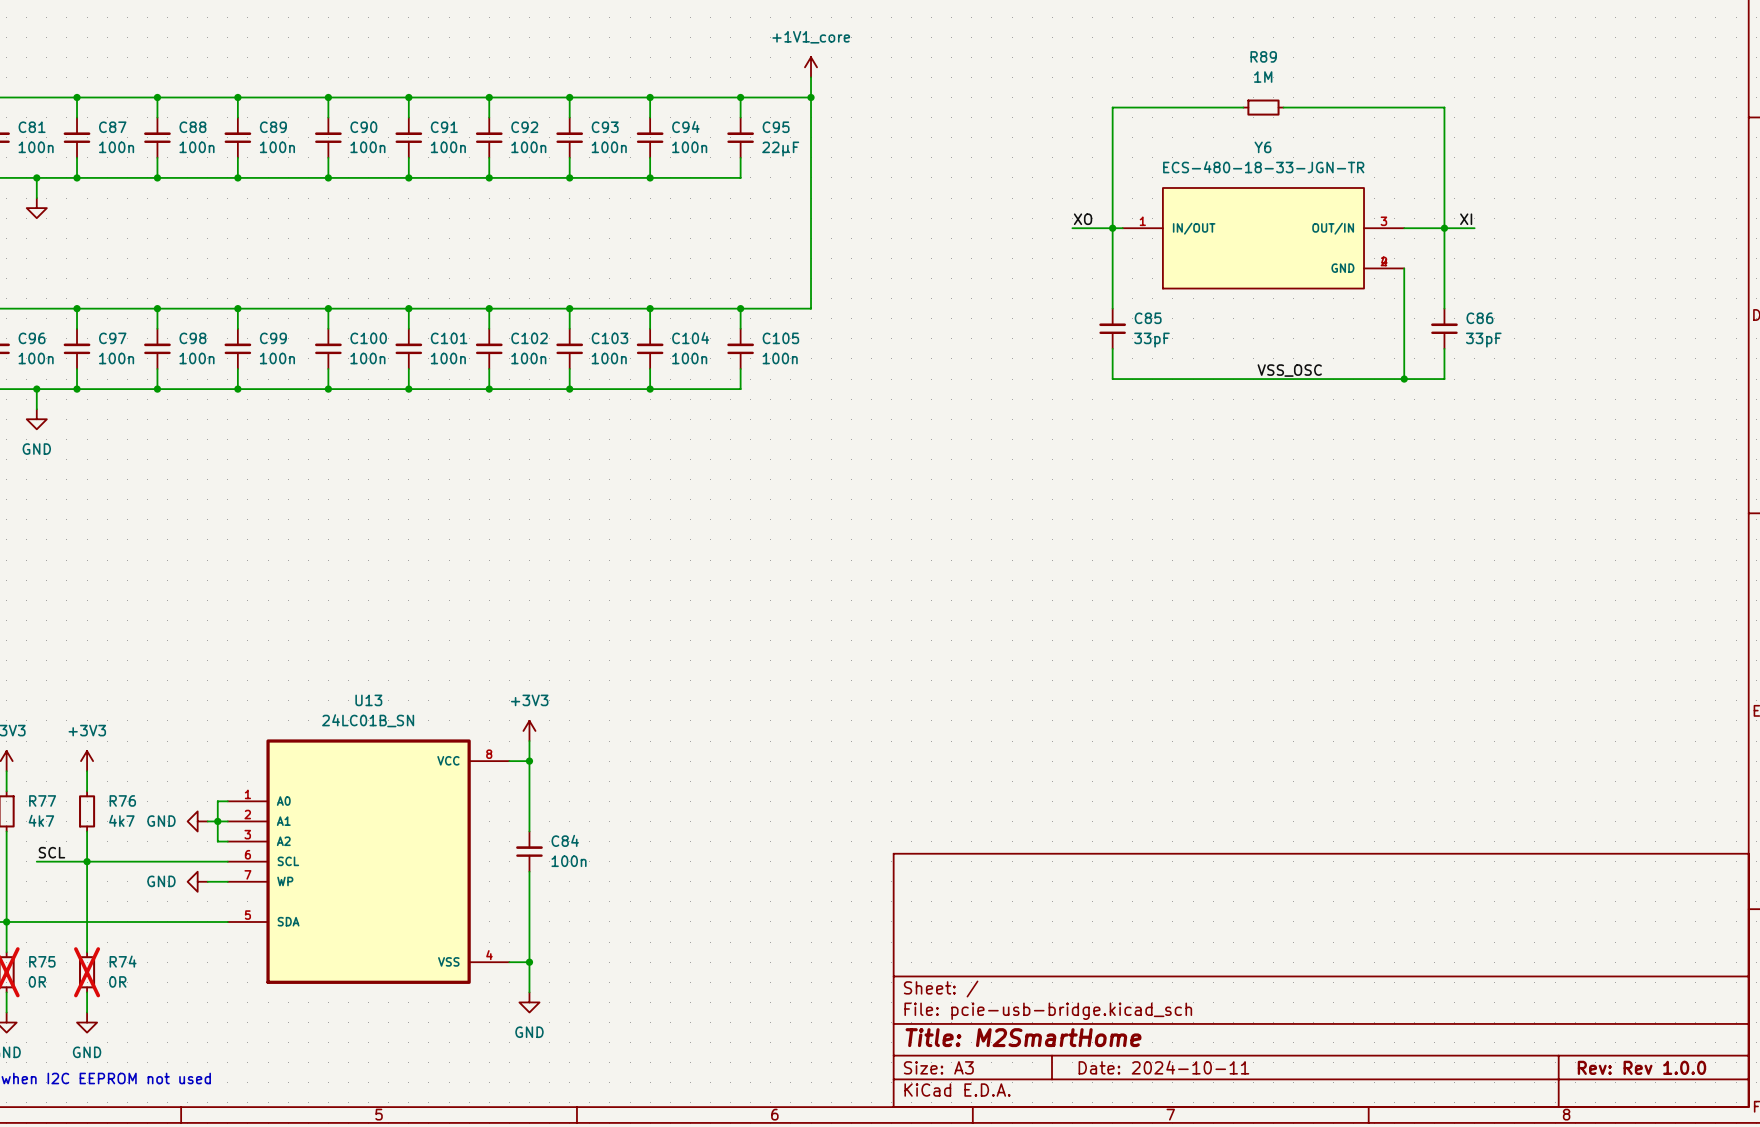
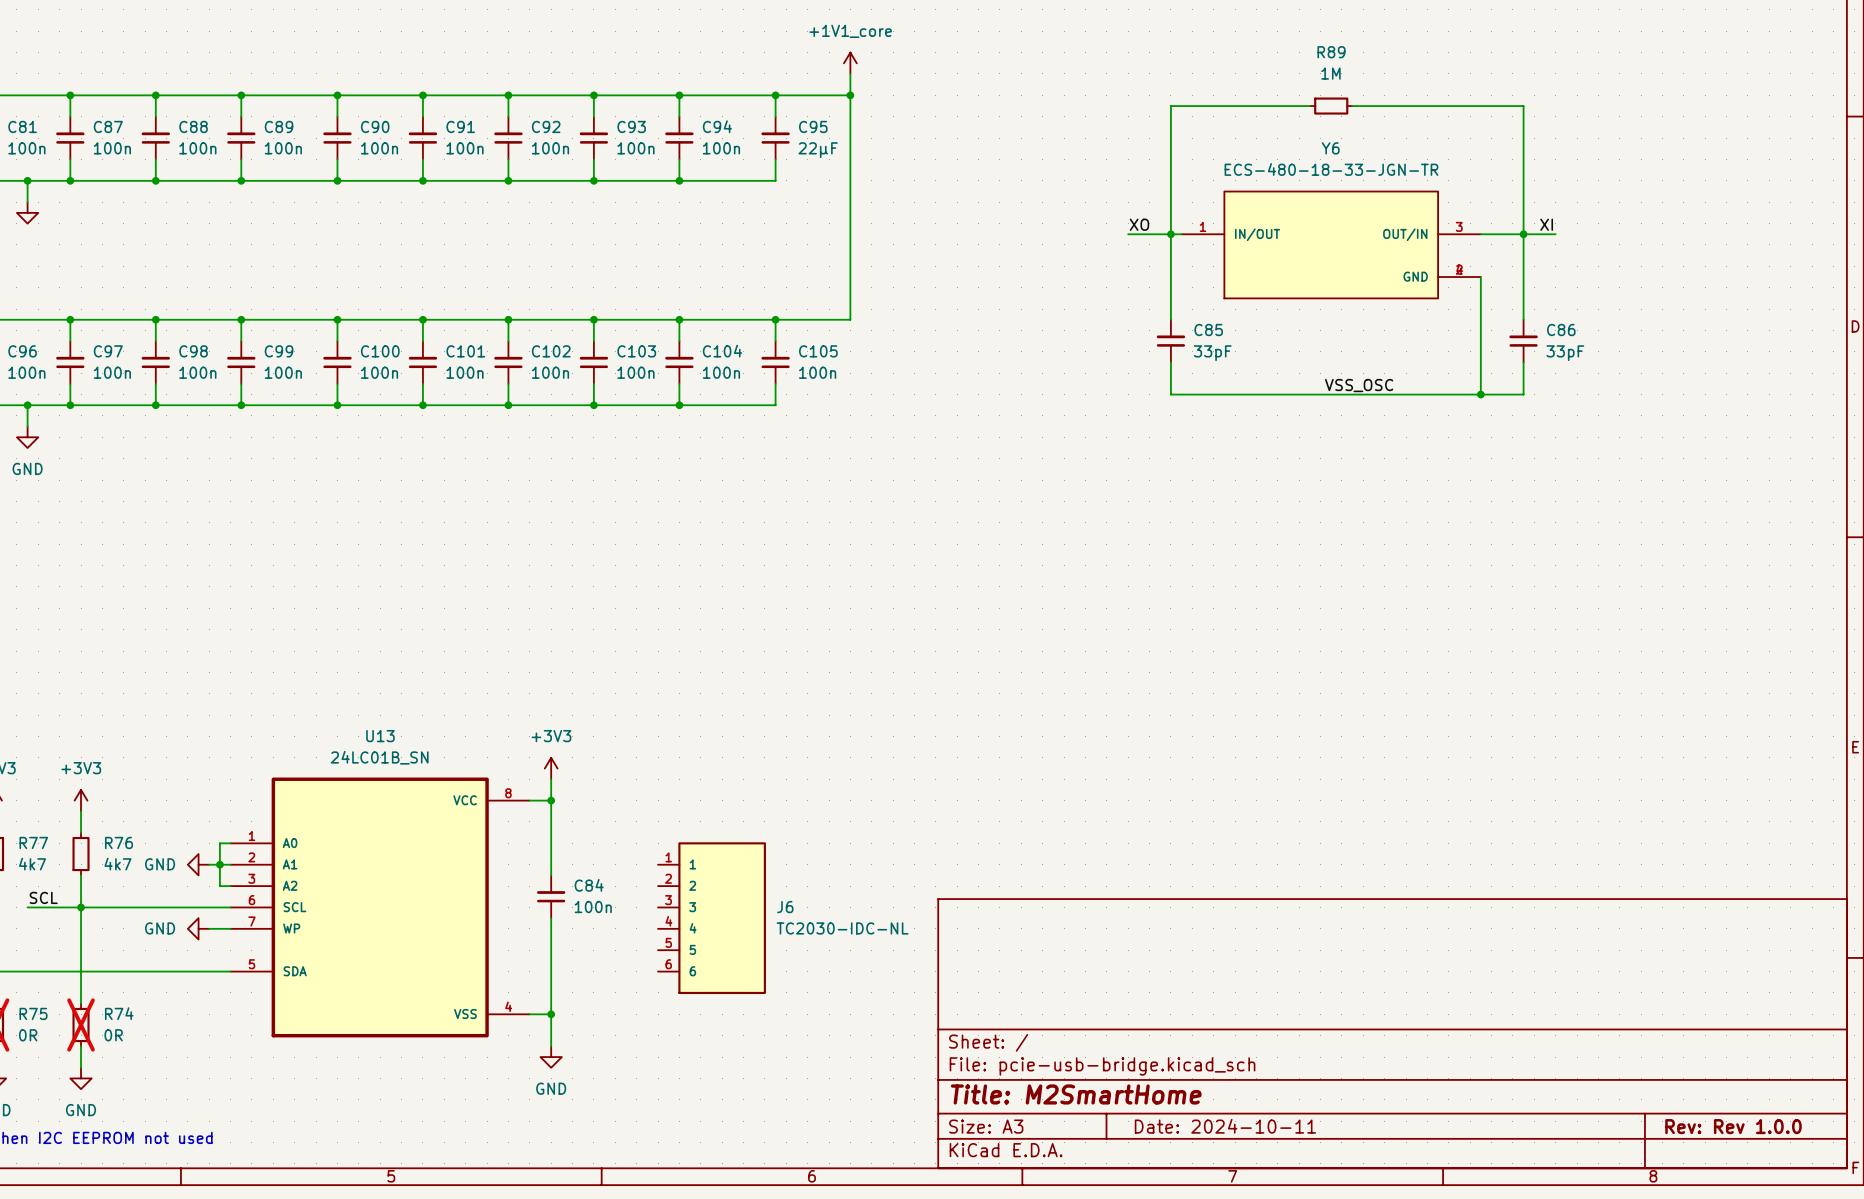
J6: none -> TC2030-IDC-NL (712, 918)

